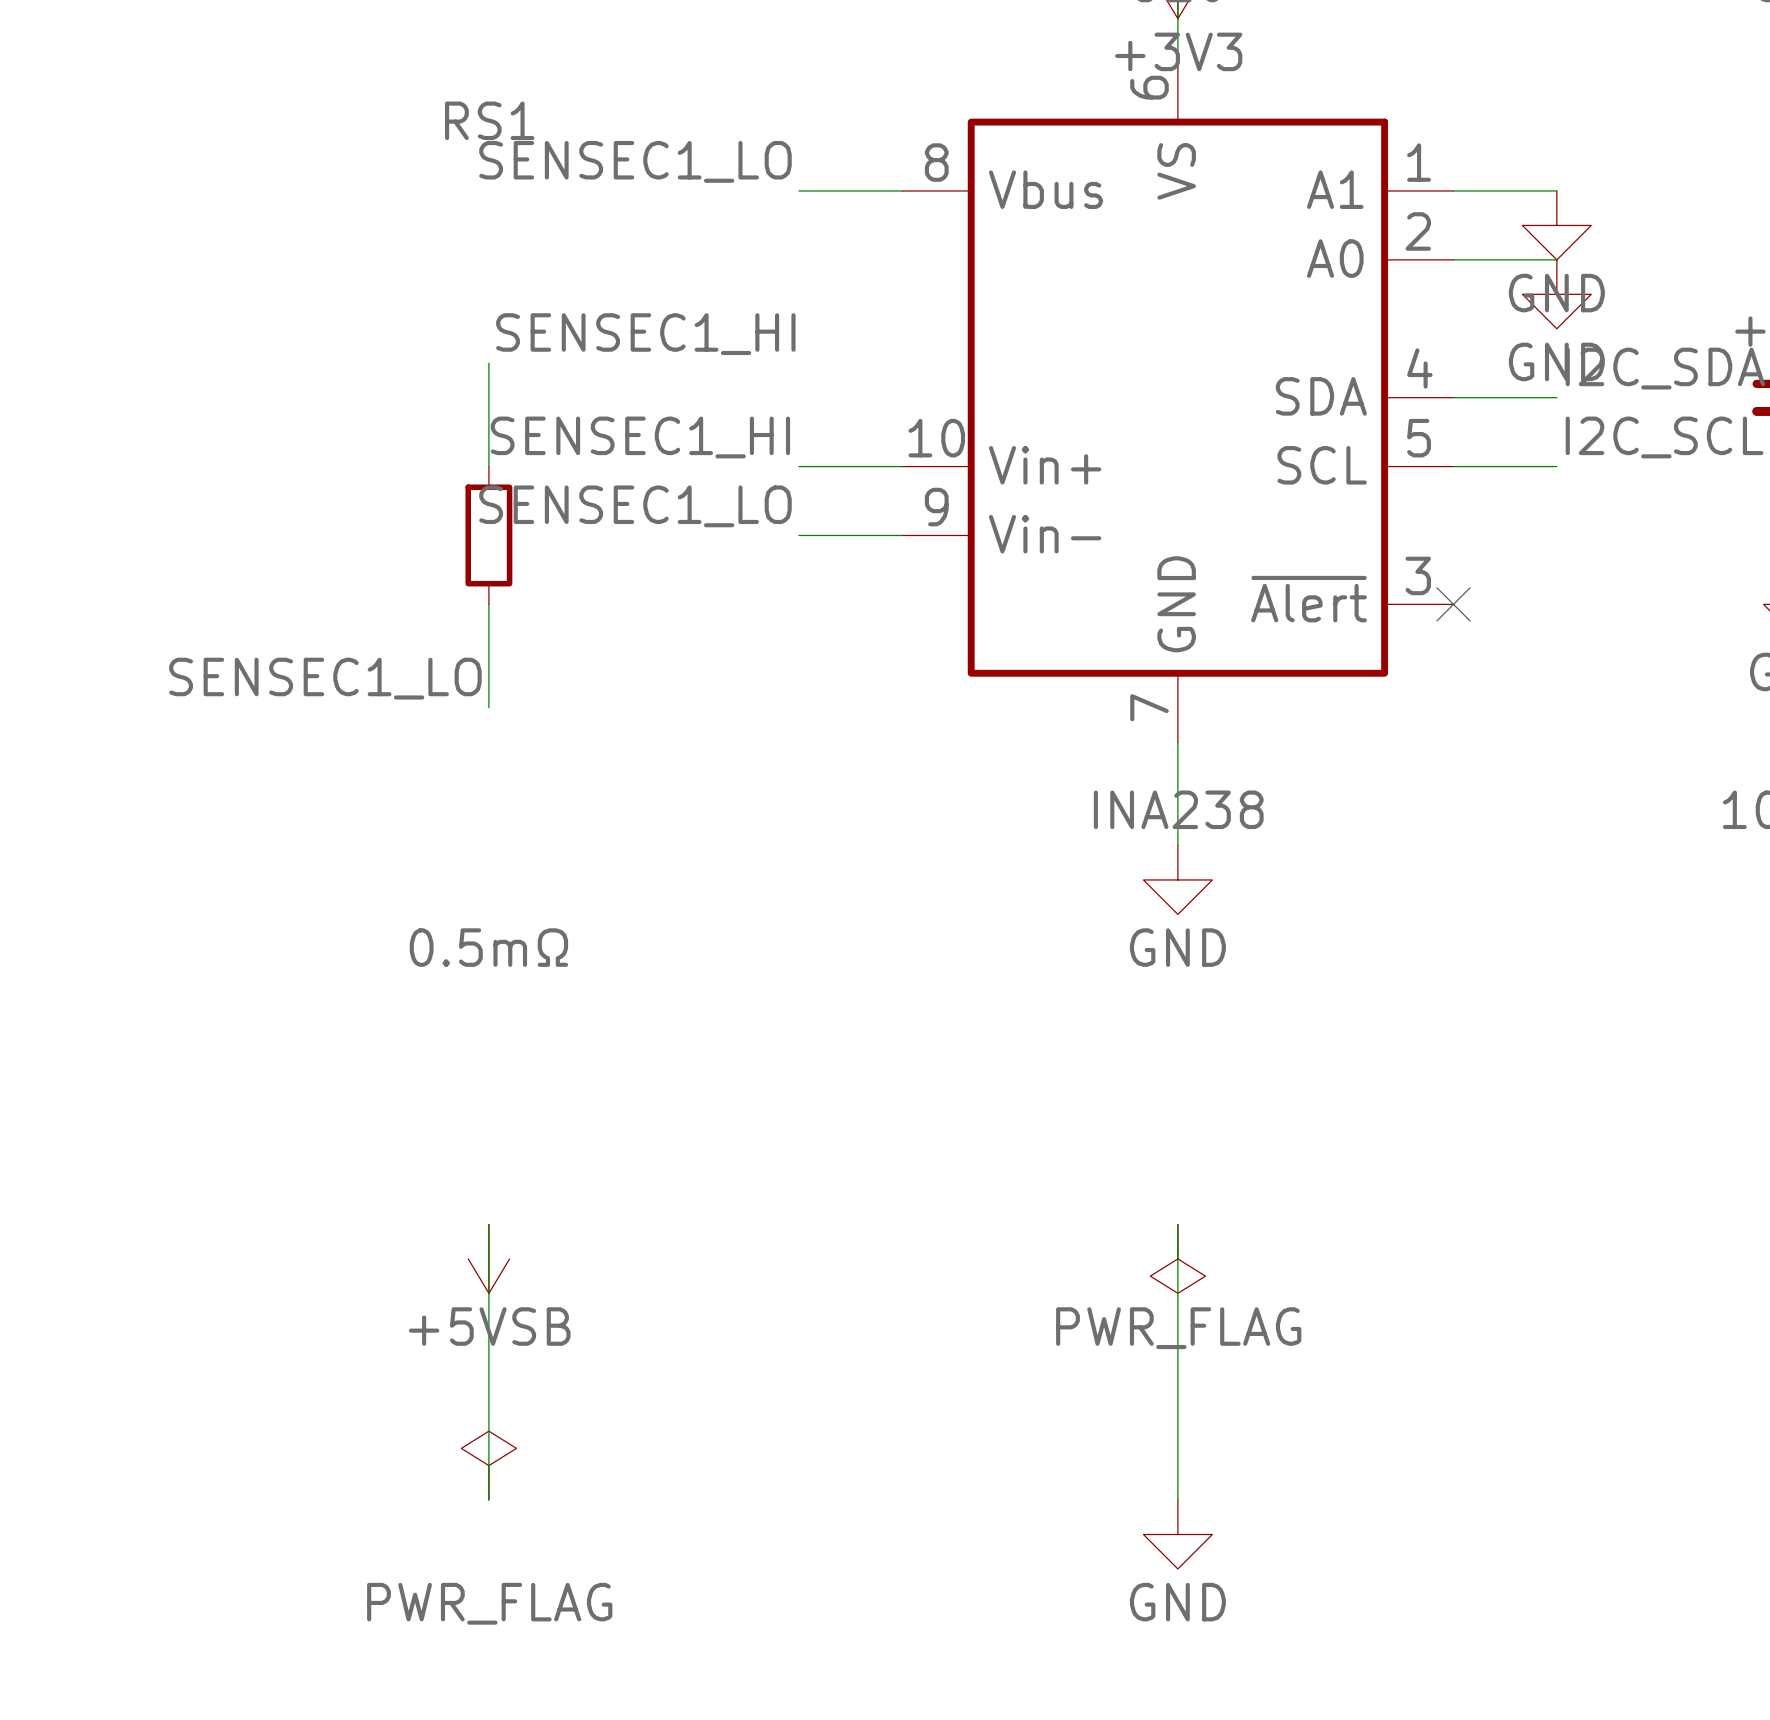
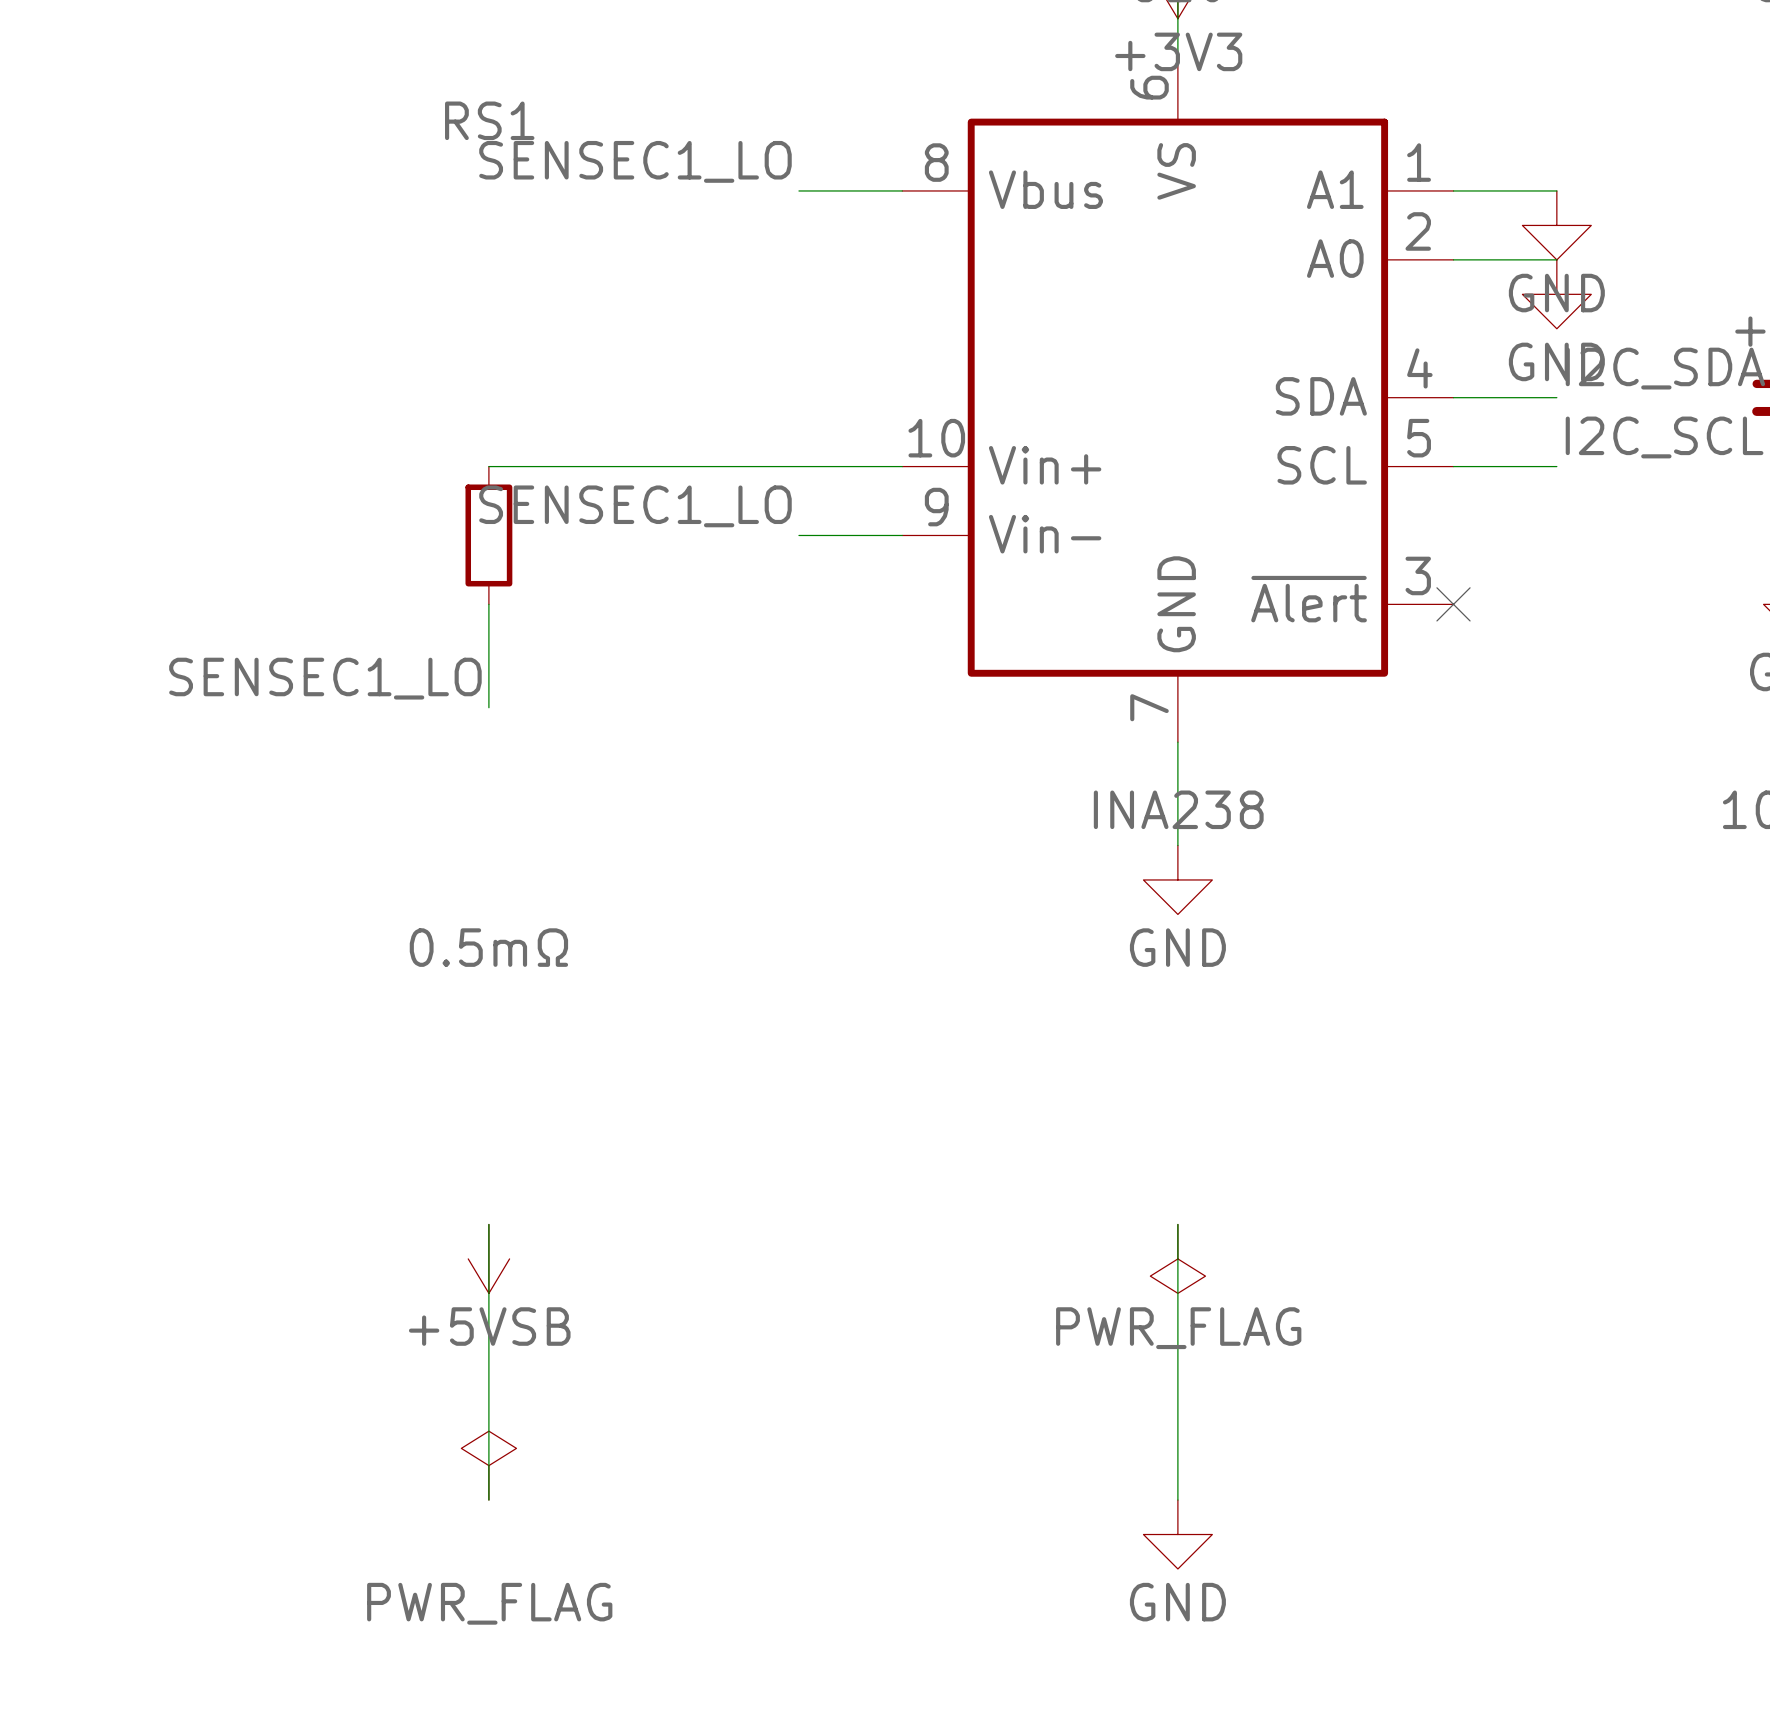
label: SENSEC1_HI (645, 334) -> none
wire: (488, 363) (488, 466) -> (798, 466) (488, 466)
label: SENSEC1_HI (640, 437) -> none

